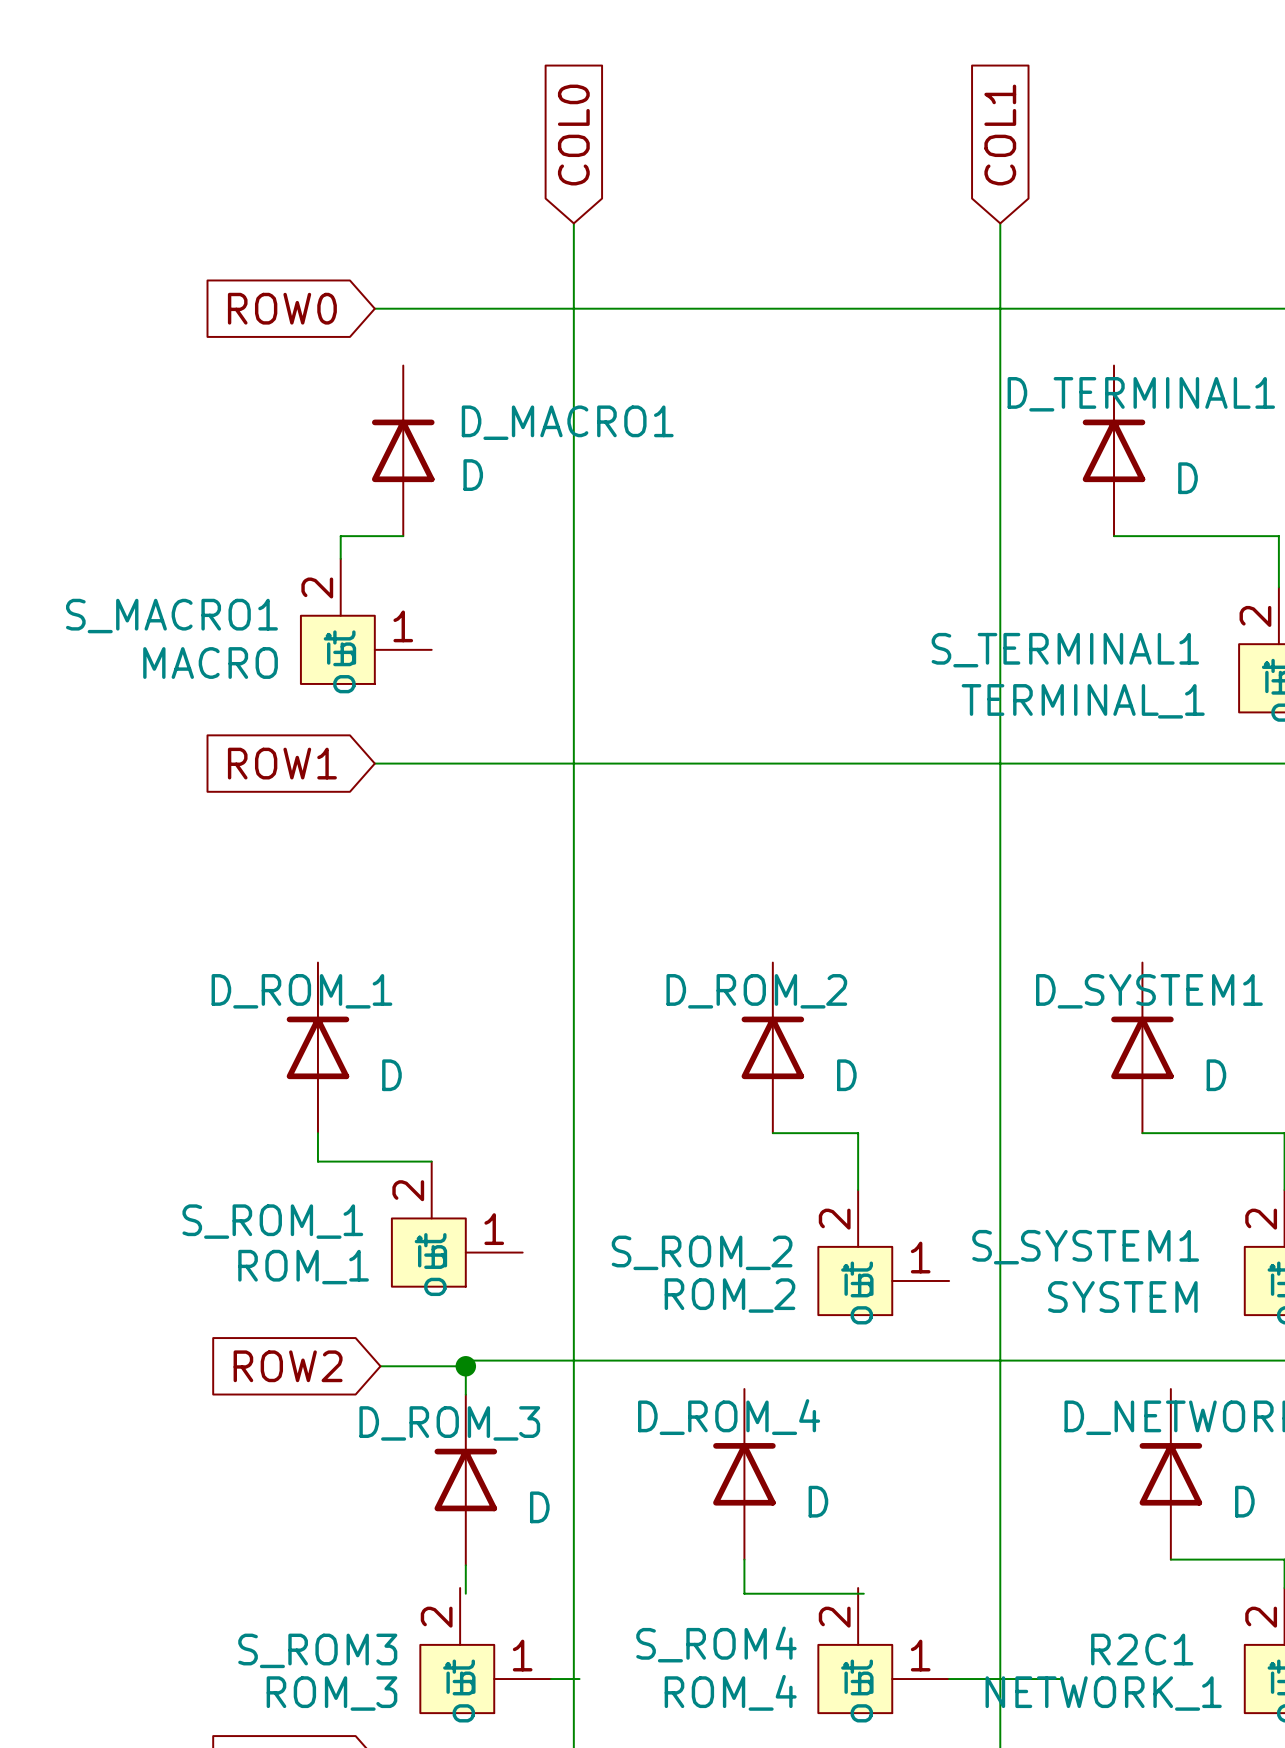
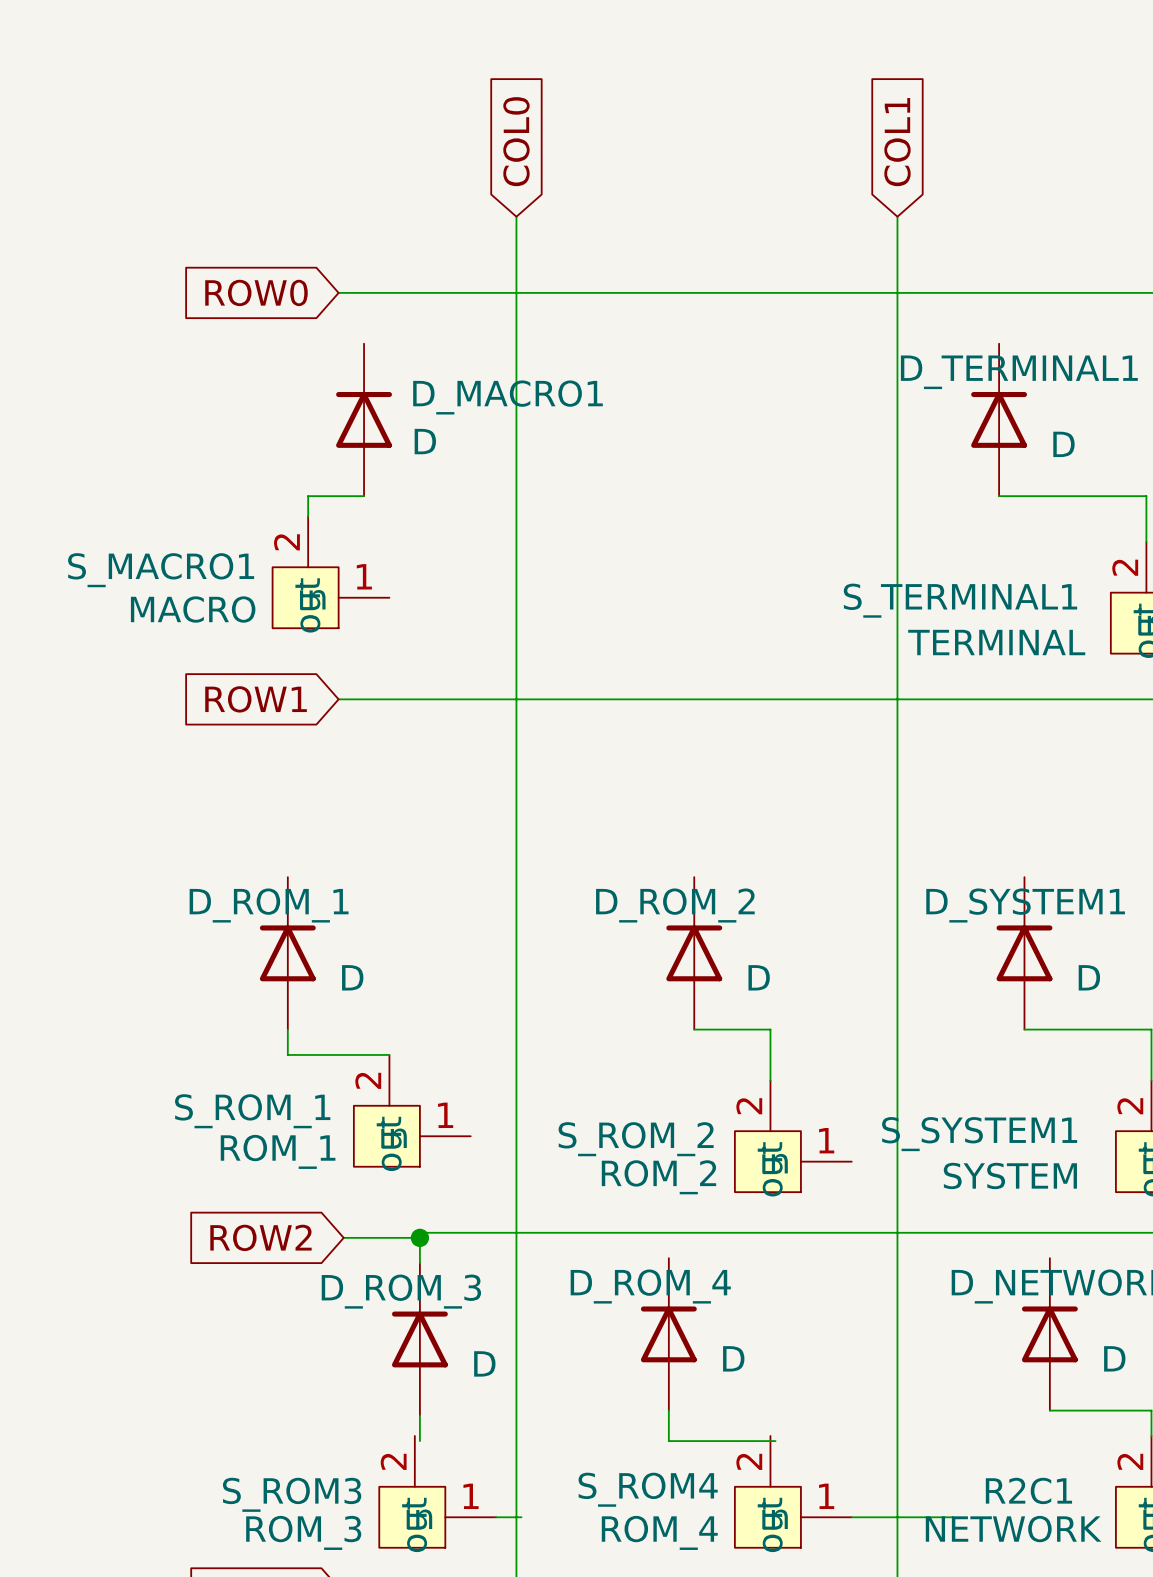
S_TERMINAL1 value: TERMINAL_1 (1083, 701) -> TERMINAL (996, 642)
R2C1 value: NETWORK_1 (1103, 1693) -> NETWORK (1013, 1529)

